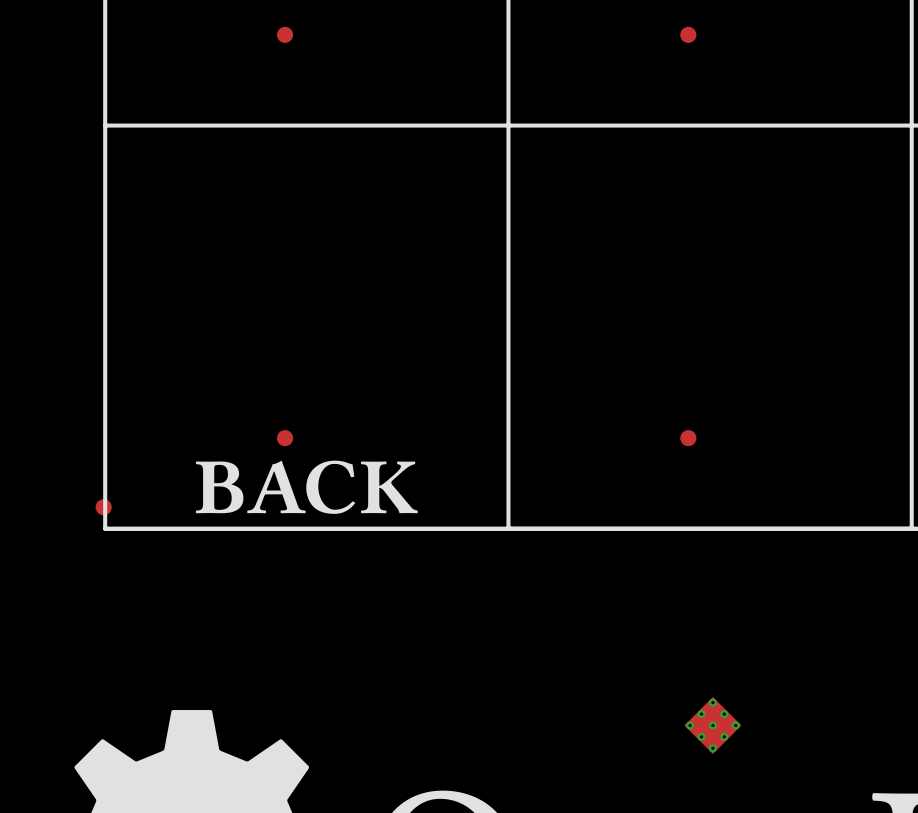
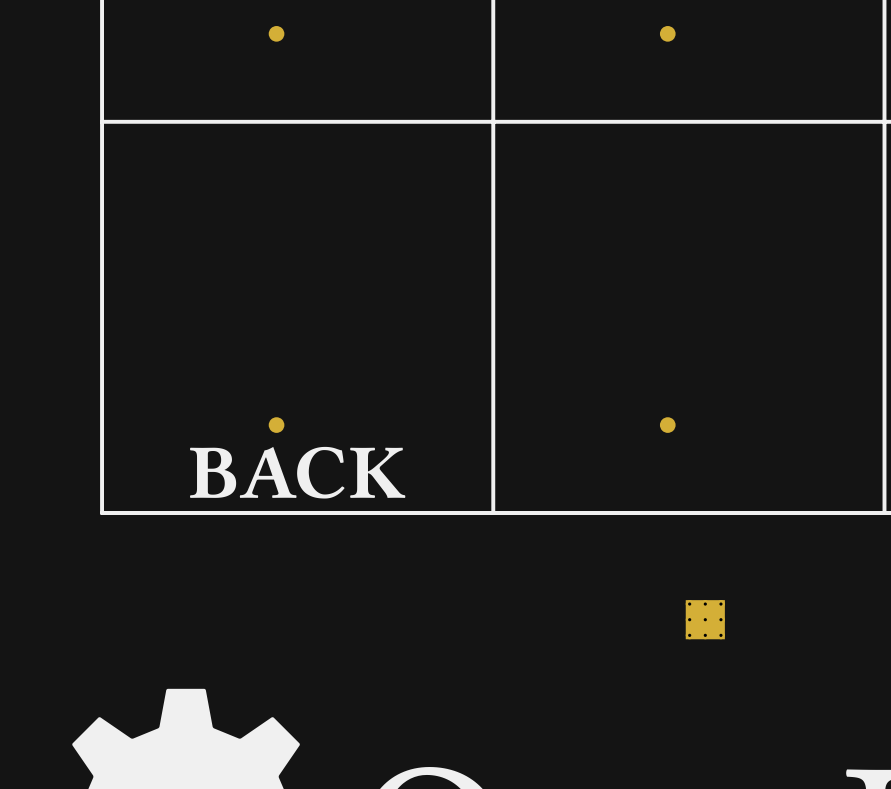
part: (103, 507) -> none
part: none -> (705, 619)
part: (712, 725) -> none

